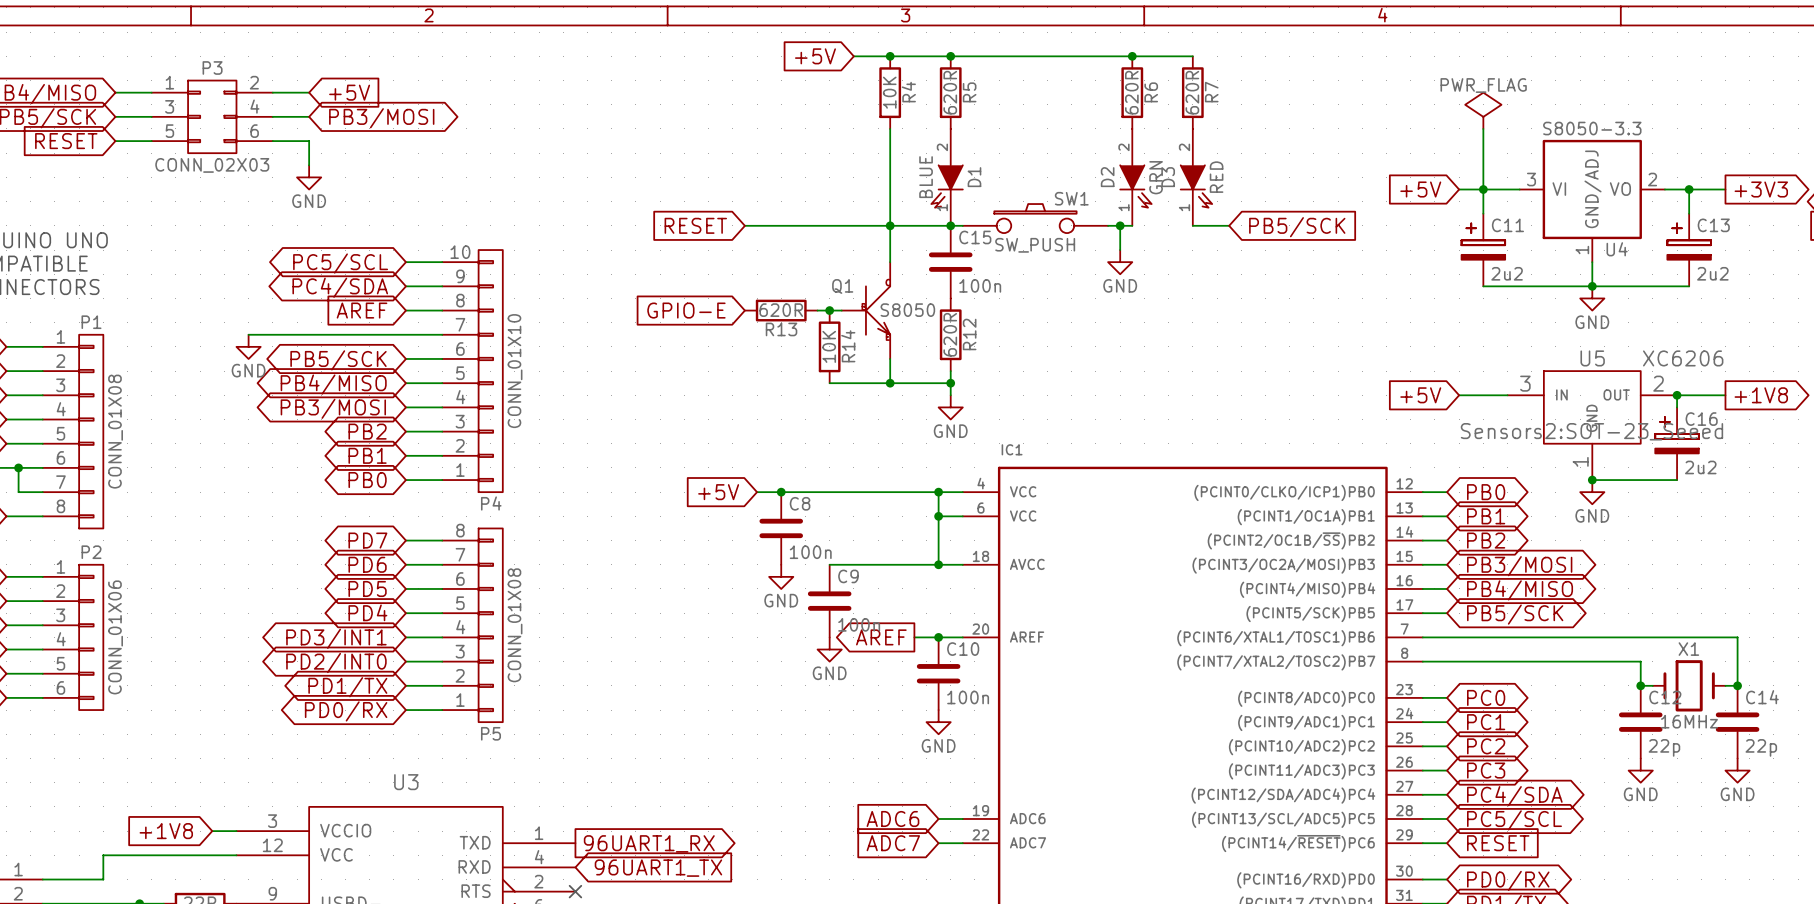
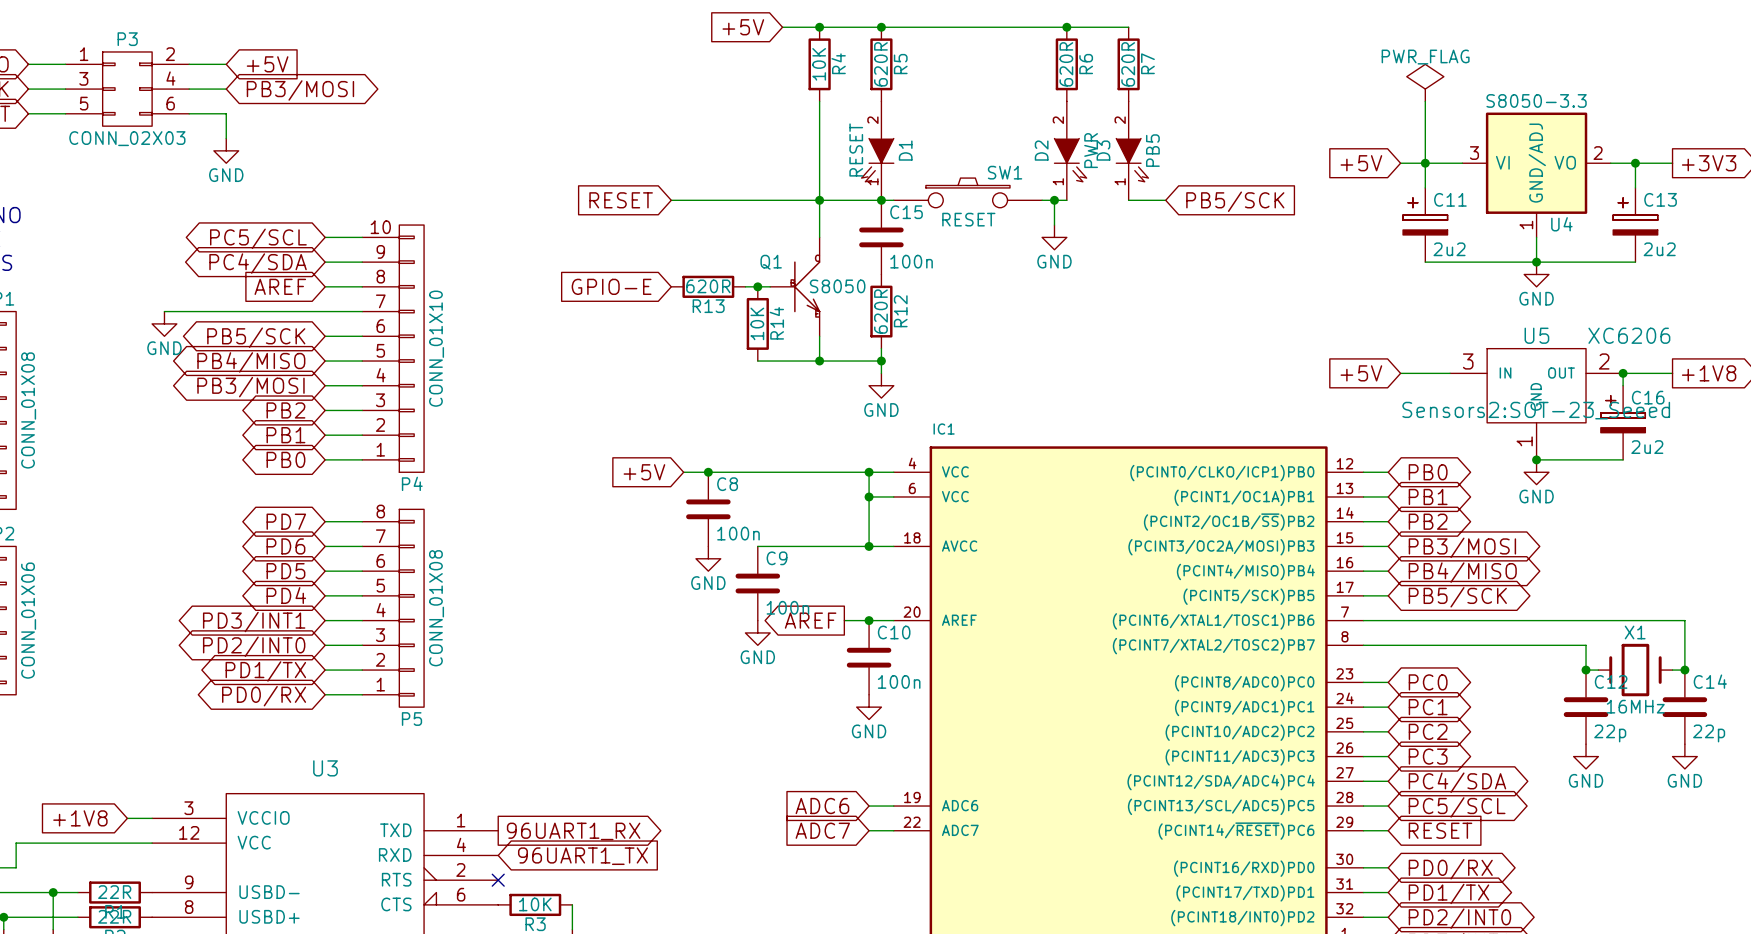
D1 value: BLUE (926, 177) -> RESET (856, 149)
D2 value: GRN (1156, 177) -> PWR (1091, 150)
D3 value: RED (1216, 177) -> PB5 (1152, 150)
SW1 value: SW_PUSH (1035, 245) -> RESET (968, 219)

